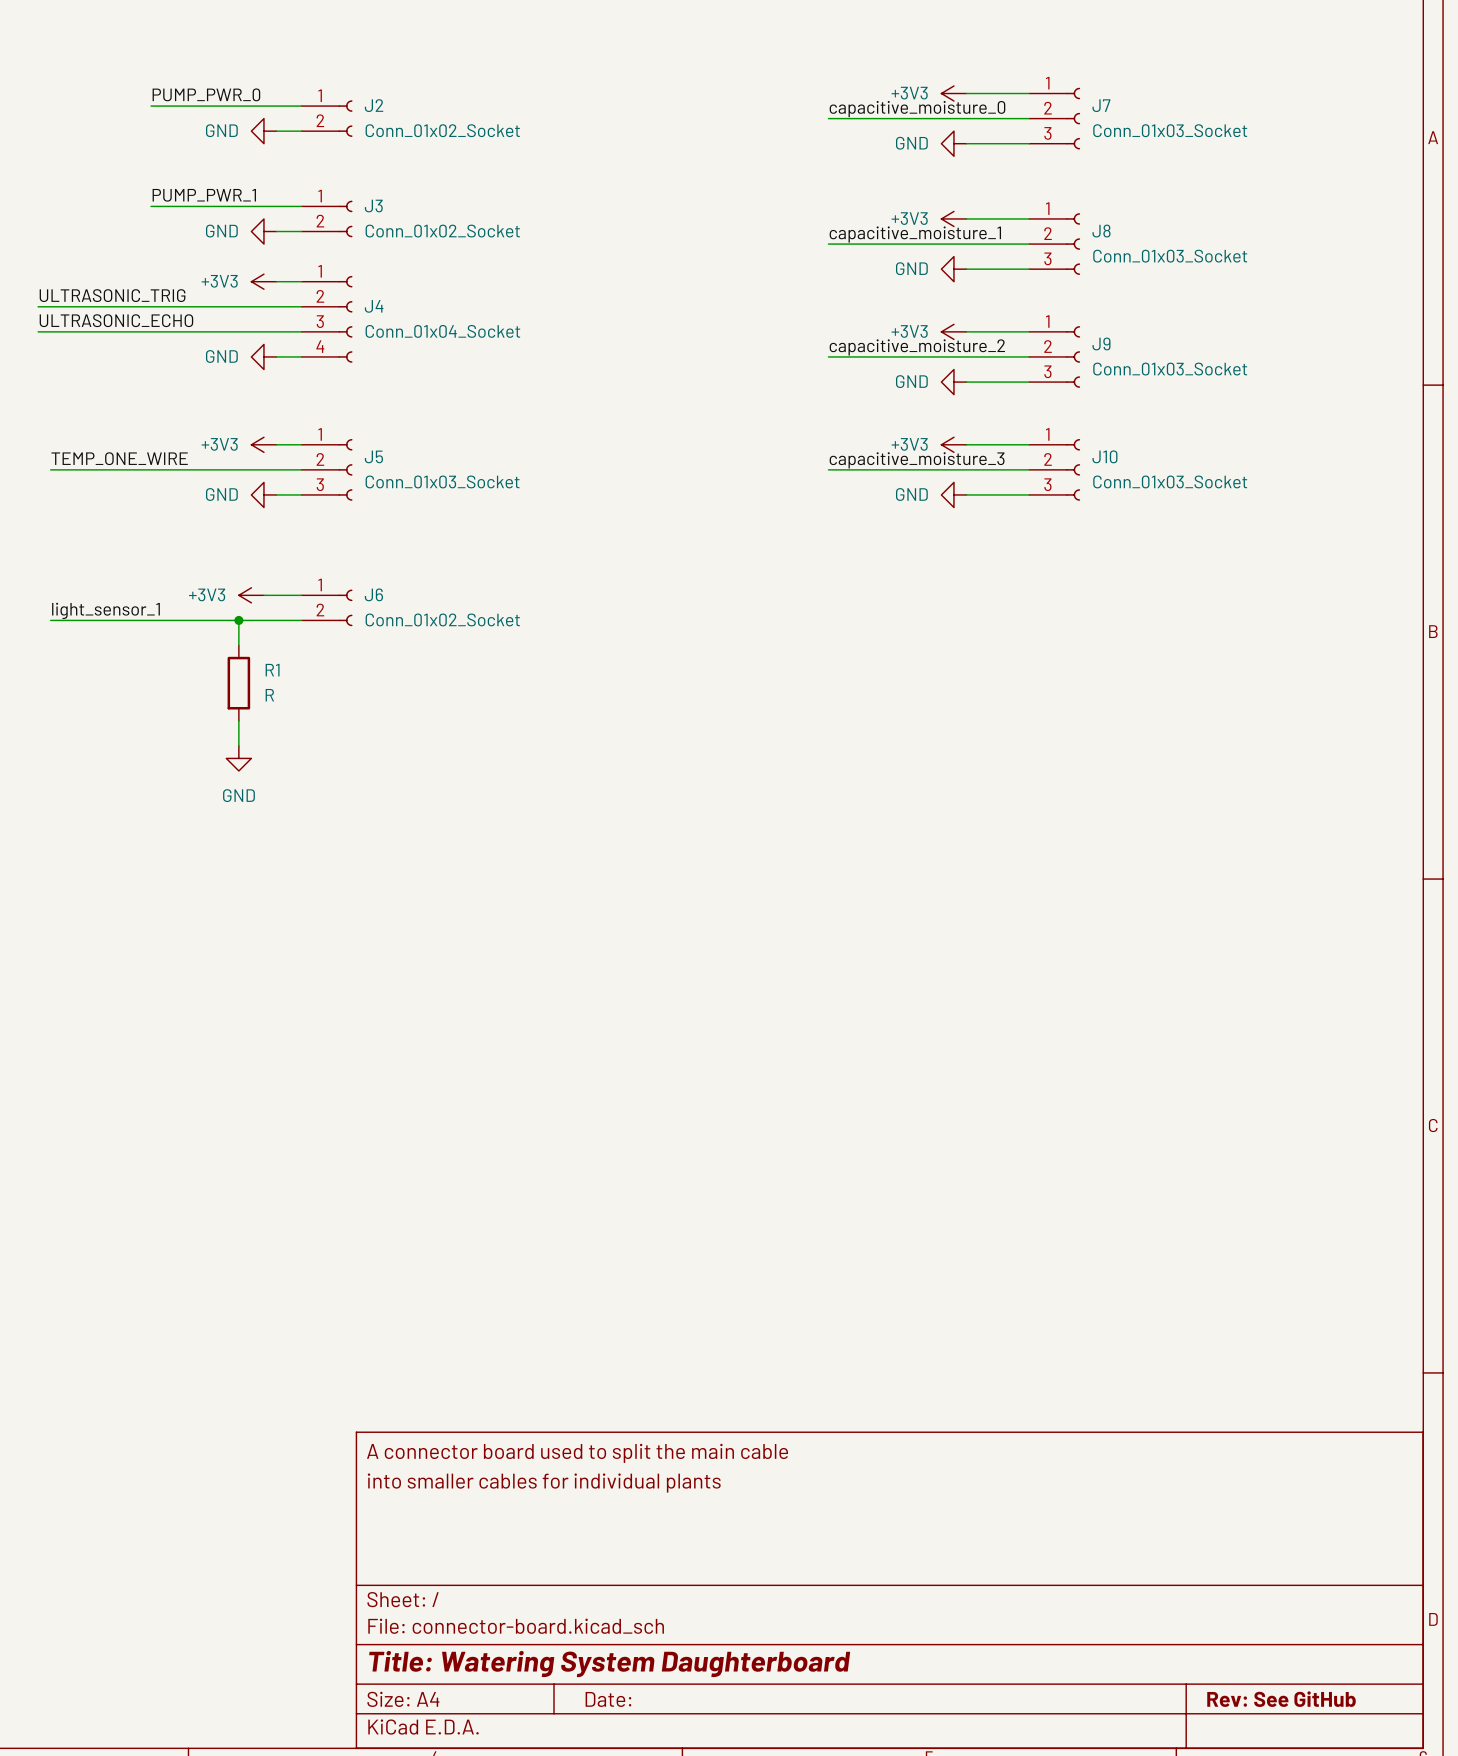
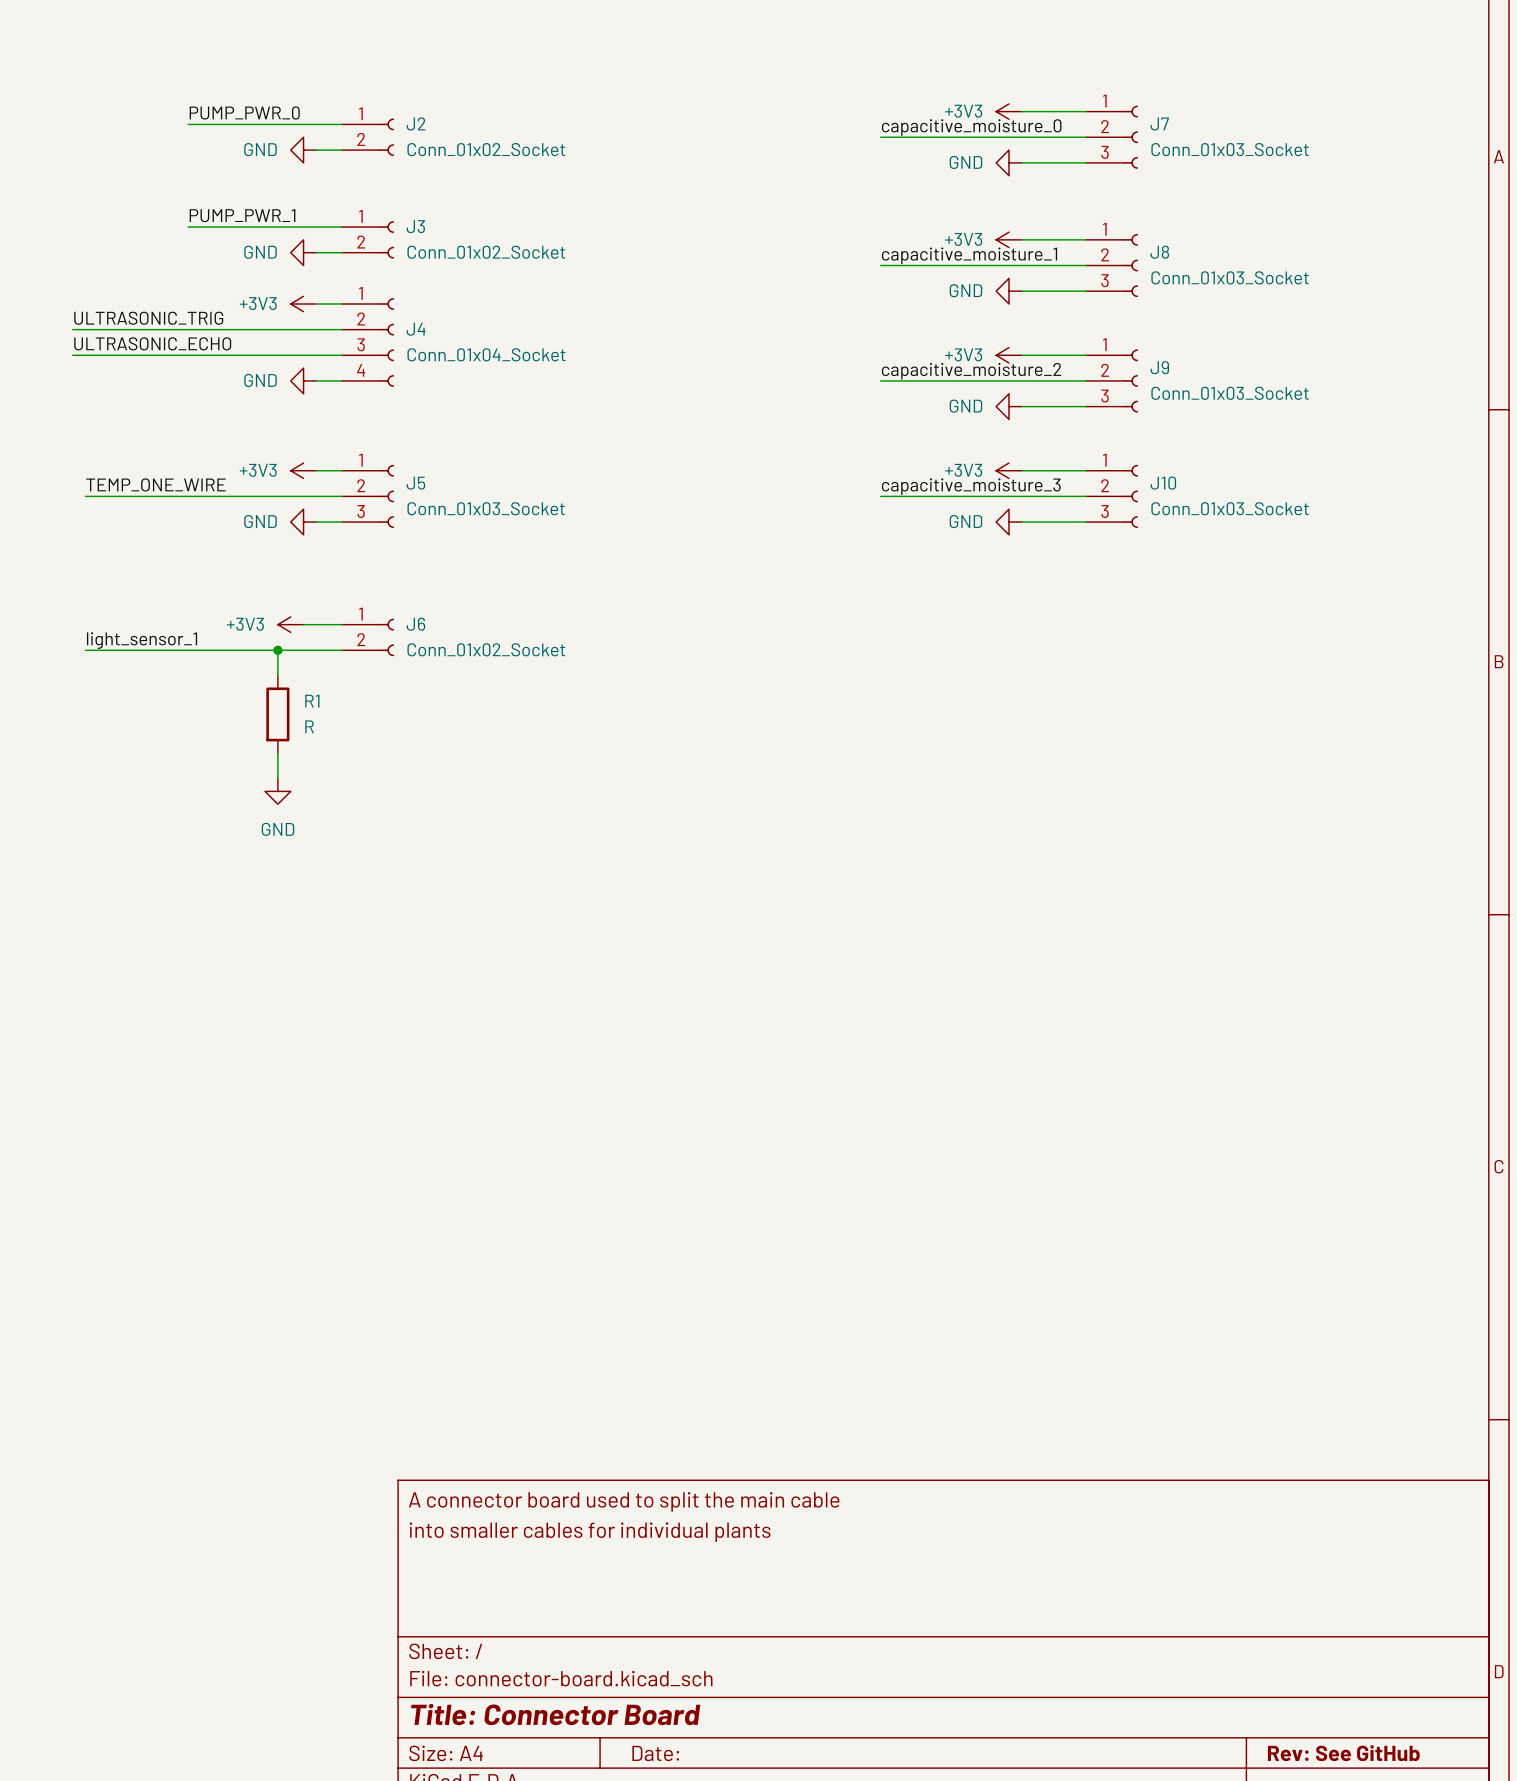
title block: Title: Watering System Daughterboard (609, 1664) -> Title: Connector Board (555, 1714)

